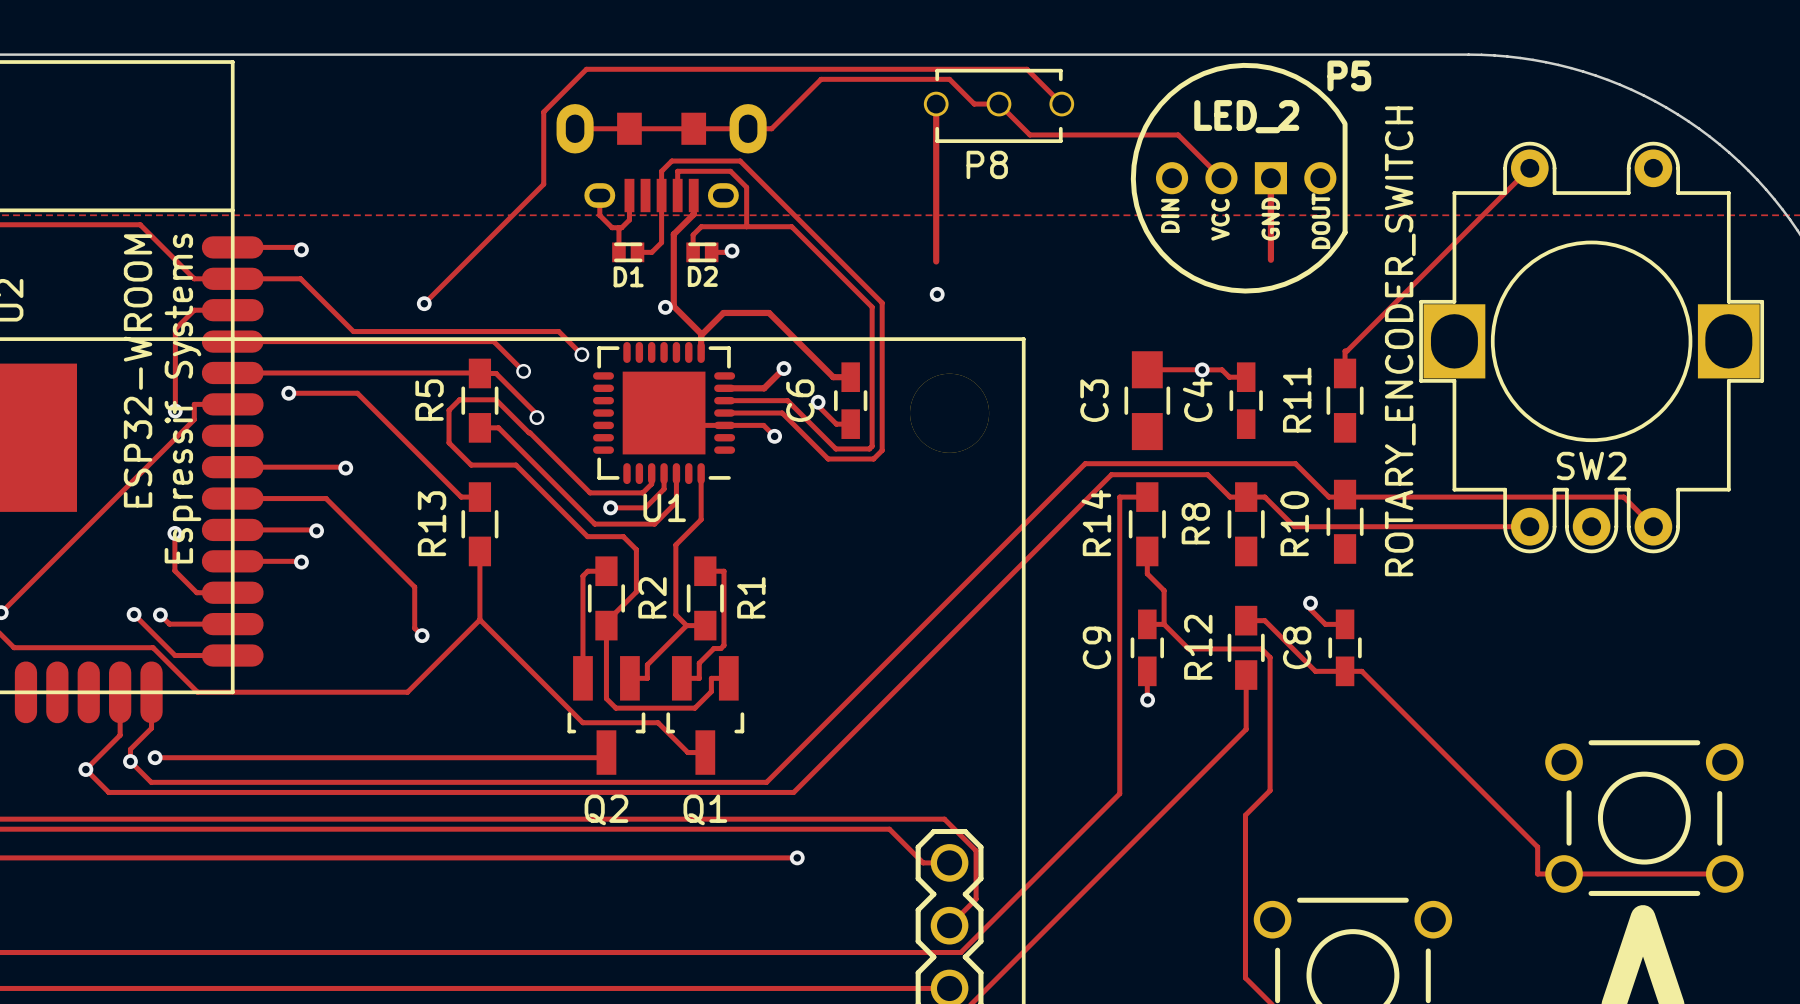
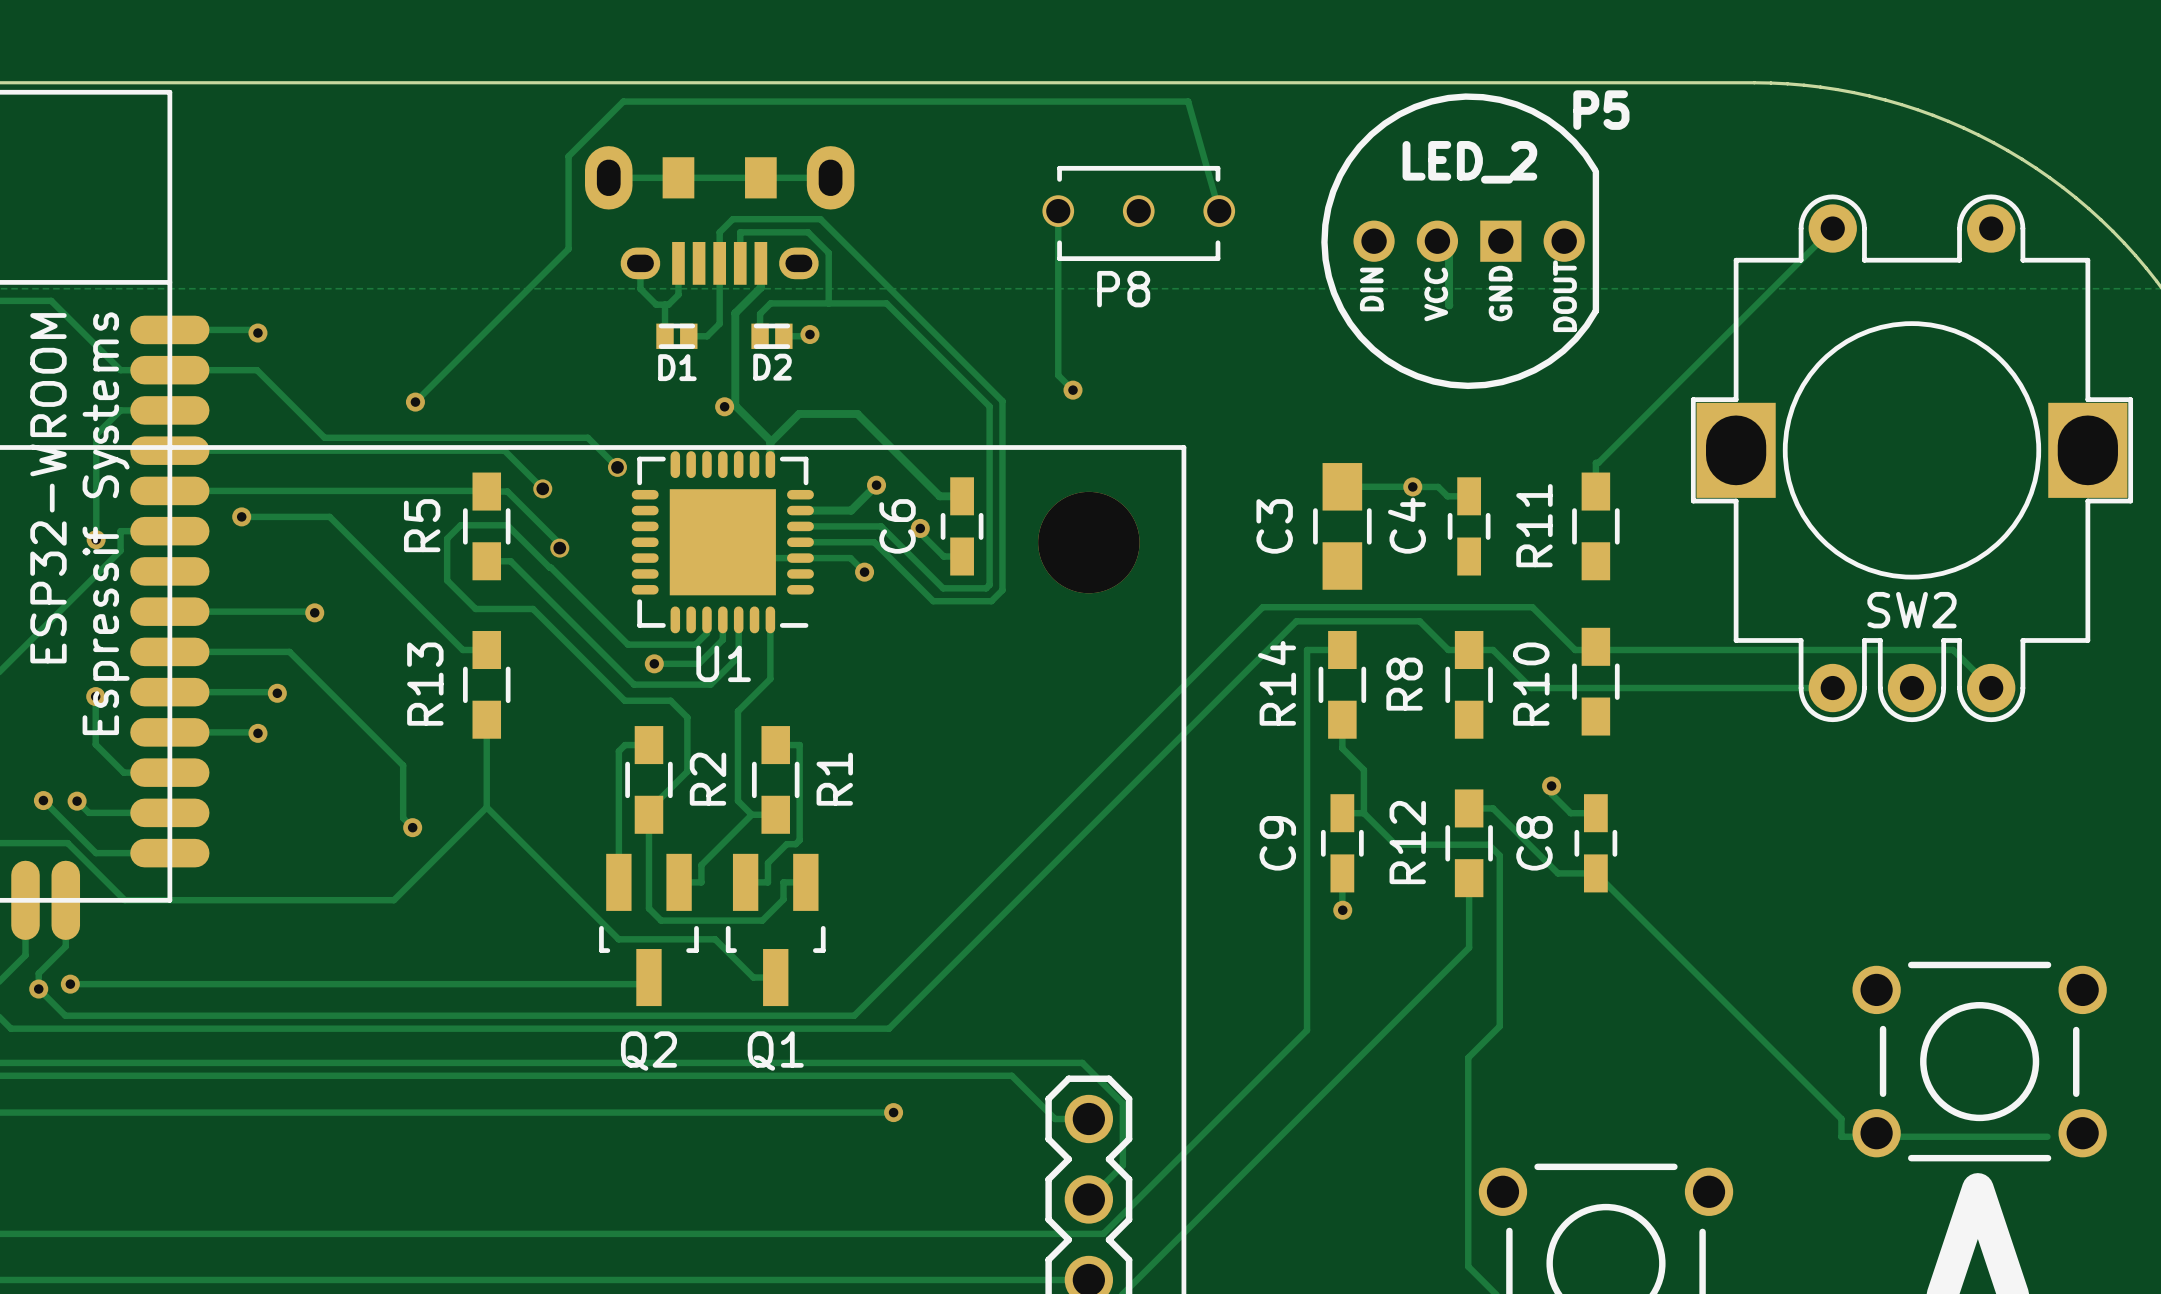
track: (1027, 69) (1061, 104) -> (1188, 101) (1219, 211)
track: (936, 104) (936, 261) -> none
P8 position: (999, 105) -> (1138, 213)
track: (748, 128) (771, 128) (821, 79) (949, 79) (974, 104) (999, 104) (1029, 134) (1178, 134) (1221, 178) -> none
track: none -> (1058, 211) (1058, 375) (1073, 390)
track: none -> (1449, 241) (1449, 305)
track: (1270, 218) (1270, 178) (1270, 259) -> none
SW2 value: ROTARY_ENCODER_SWITCH (1400, 341) -> none
track: (1345, 671) (1361, 671) (1537, 847) (1537, 873) (1724, 873) -> (1595, 873) (1841, 1118) (1841, 1136) (2047, 1136)

